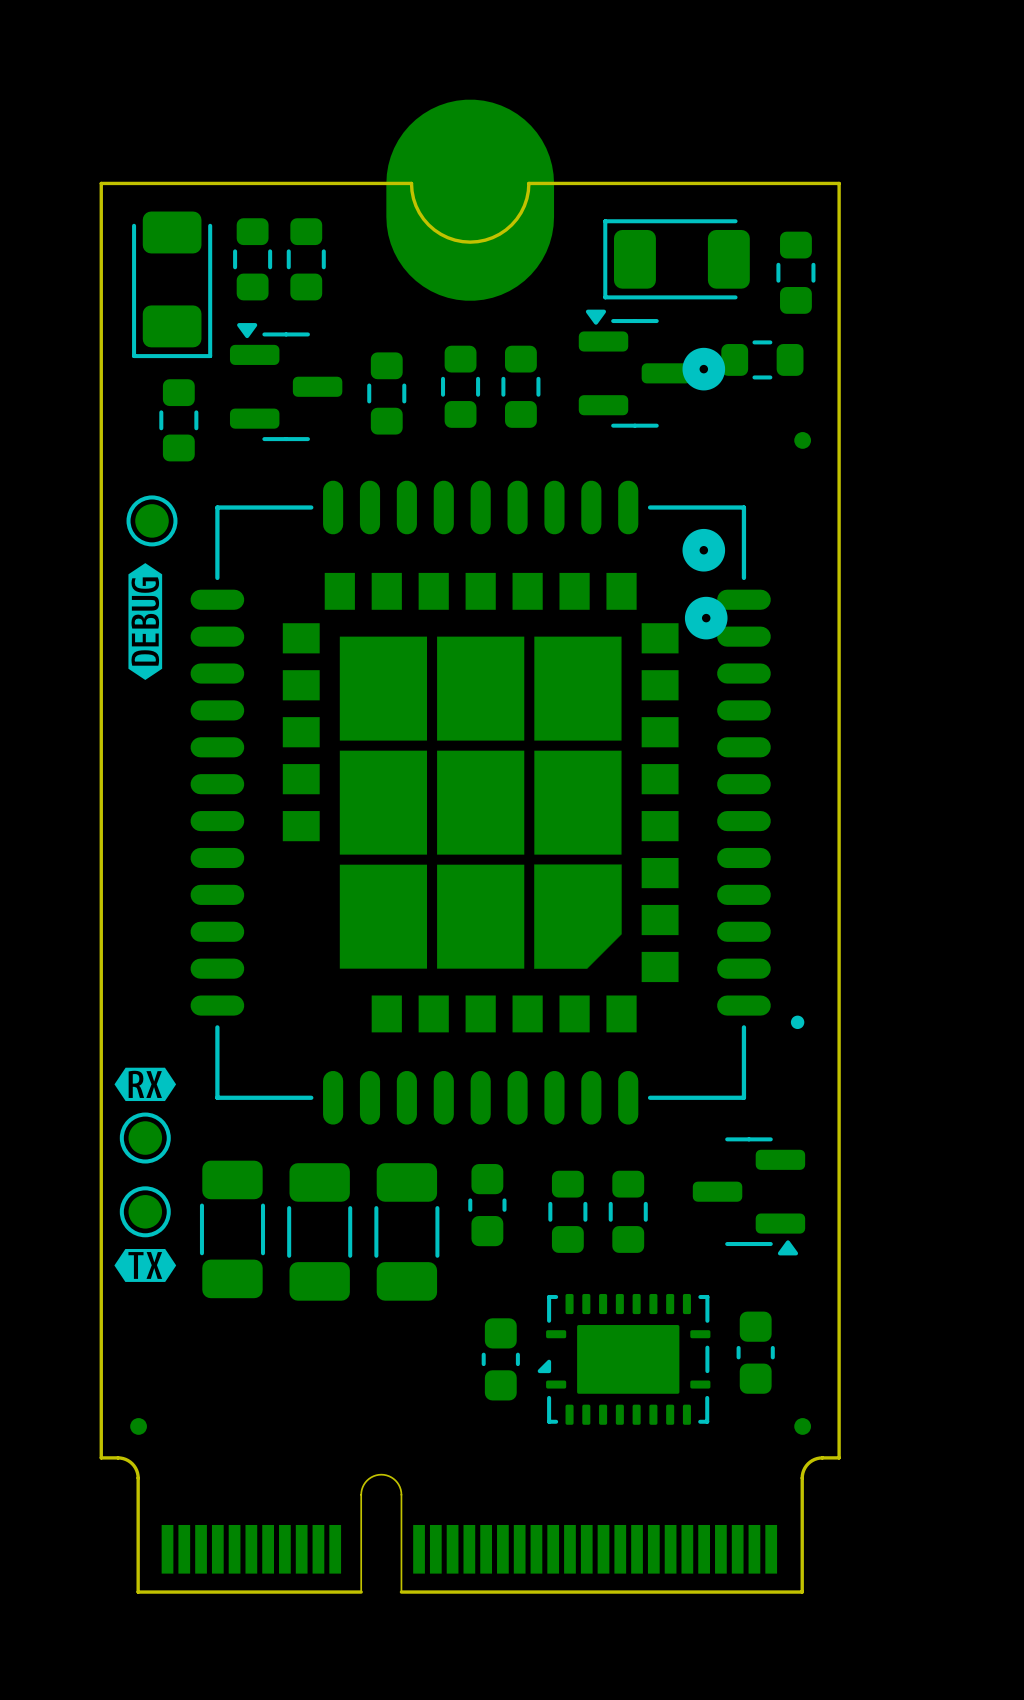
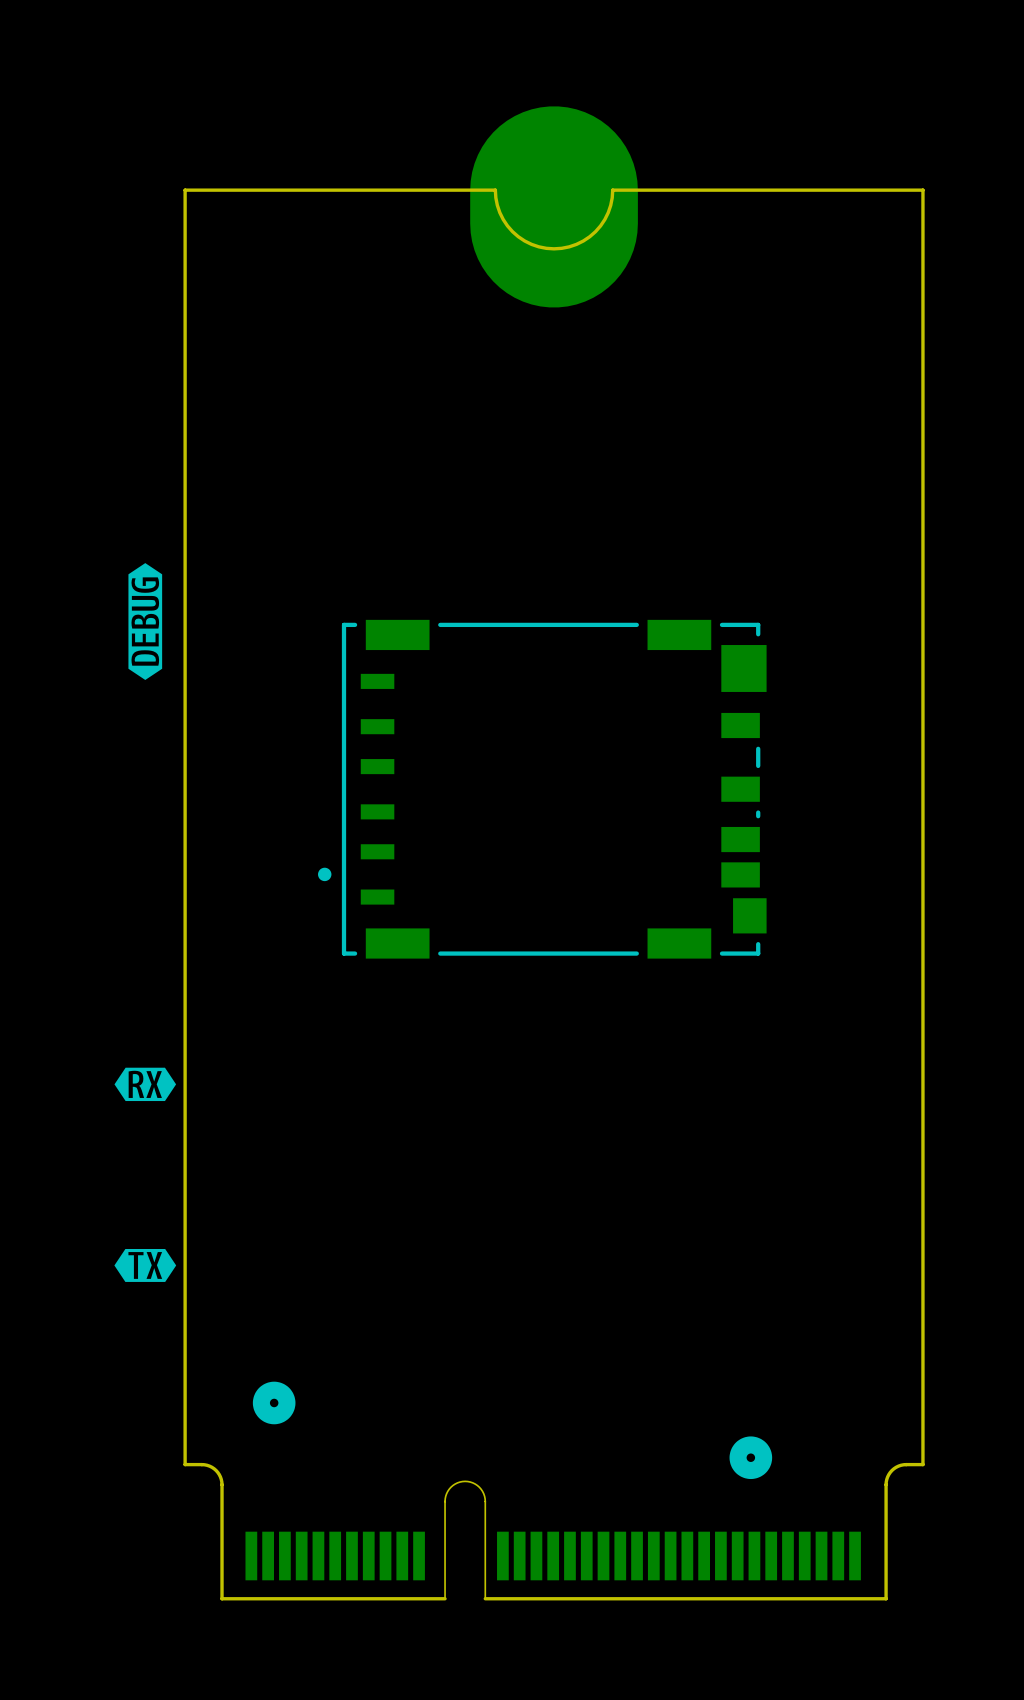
part: (252, 259) -> none
part: (306, 259) -> none
part: (676, 259) -> none
part: (795, 272) -> none
part: (172, 284) -> none
part: (762, 359) -> none
part: (634, 368) -> none
part: (703, 369) -> none
part: (286, 382) -> none
part: (460, 386) -> none
part: (520, 386) -> none
part: (386, 393) -> none
part: (178, 420) -> none
part: (802, 440) -> none
part: (152, 520) -> none
part: (703, 550) -> none
part: (706, 618) -> none
part: none -> (542, 789)
part: (497, 802) -> none
part position: (470, 846) -> (554, 853)
part: (145, 1138) -> none
part: (748, 1196) -> none
part: (487, 1205) -> none
part: (145, 1211) -> none
part: (567, 1211) -> none
part: (628, 1211) -> none
part: (232, 1229) -> none
part: (319, 1231) -> none
part: (406, 1231) -> none
part: (755, 1352) -> none
part: (500, 1359) -> none
part: (624, 1359) -> none
part: none -> (274, 1402)
part: (138, 1426) -> none
part: (802, 1426) -> none
part: none -> (750, 1457)

